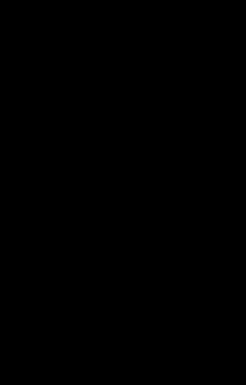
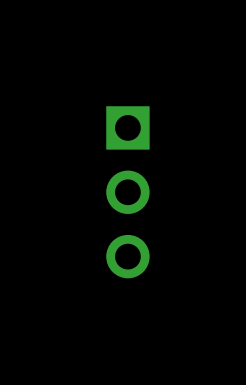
part: none -> (127, 192)

